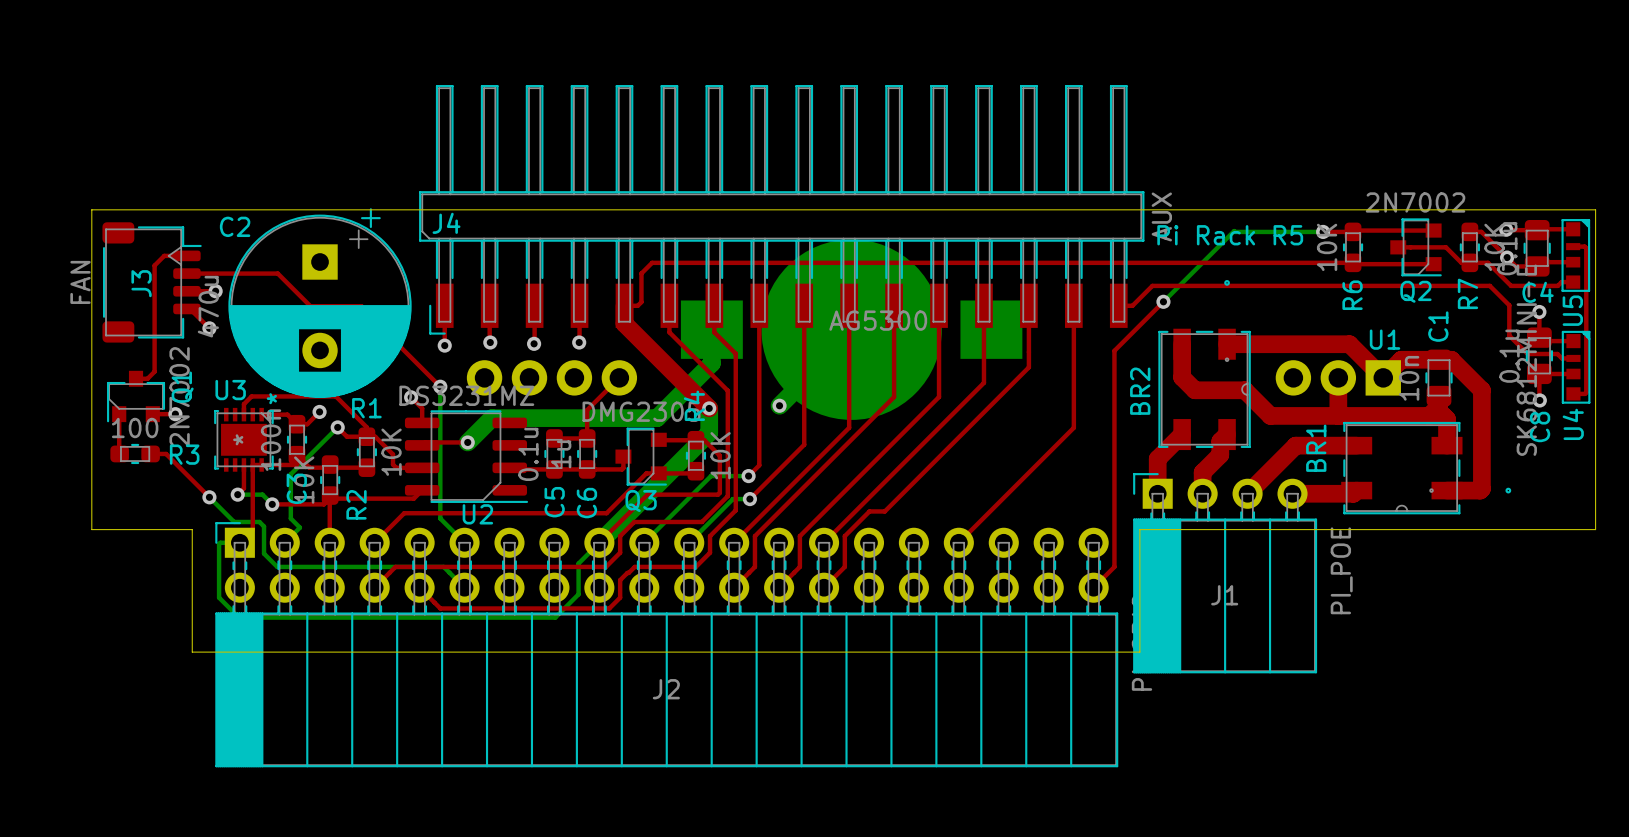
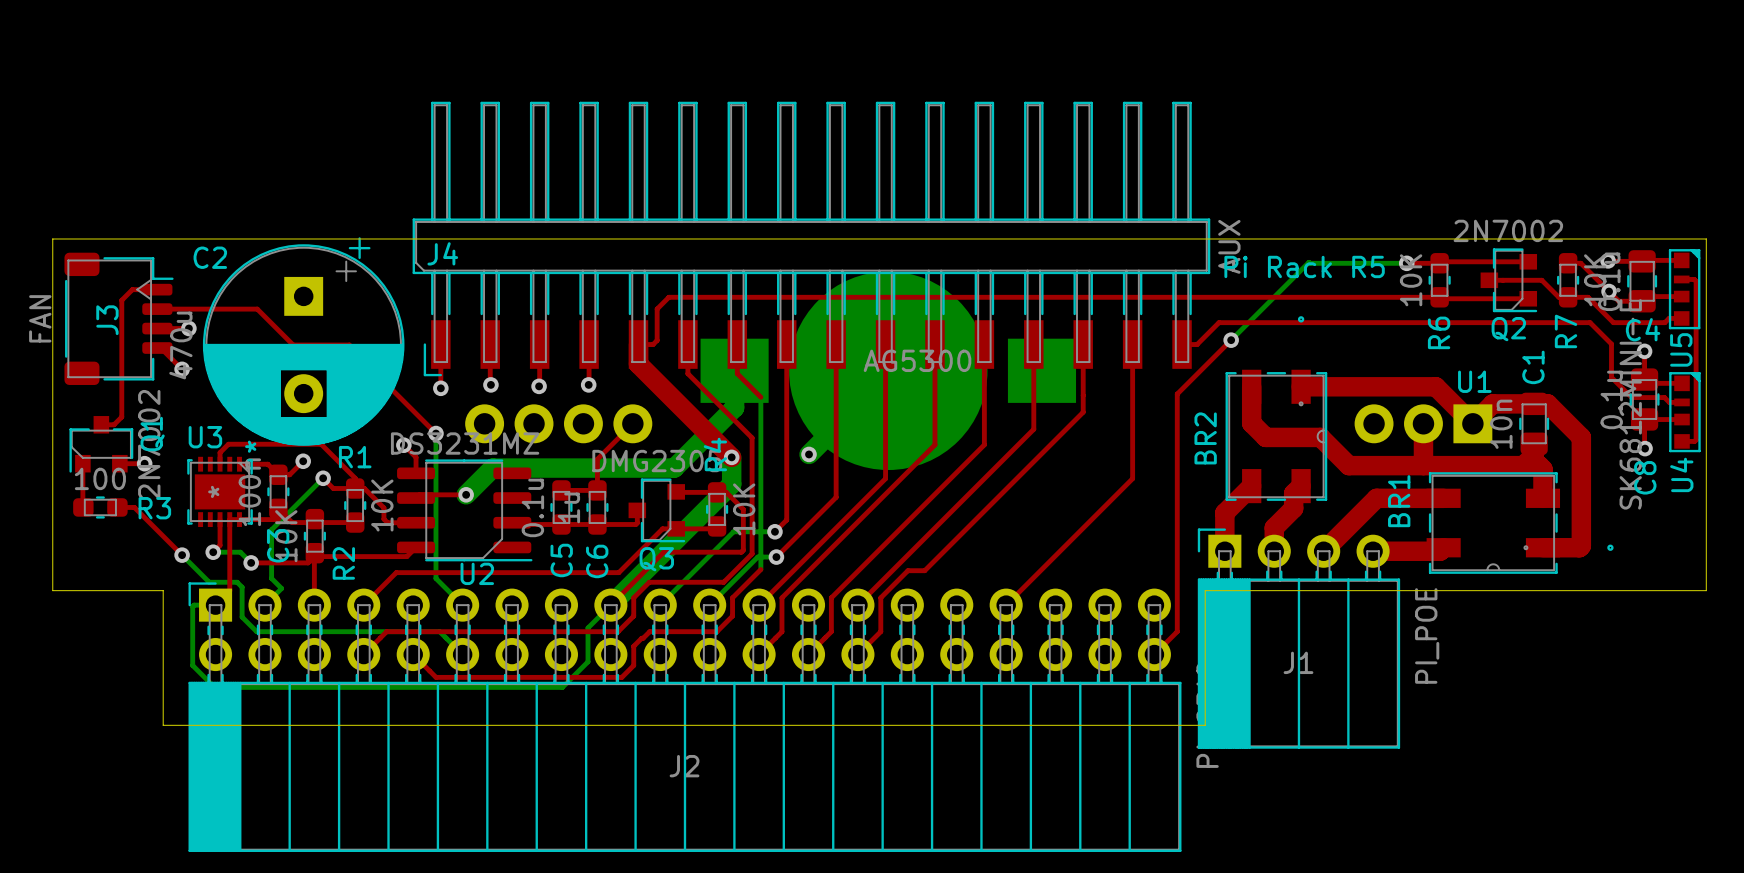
top track: (735, 353) (735, 510) -> none
bottom track: none -> (760, 397) (760, 569)

